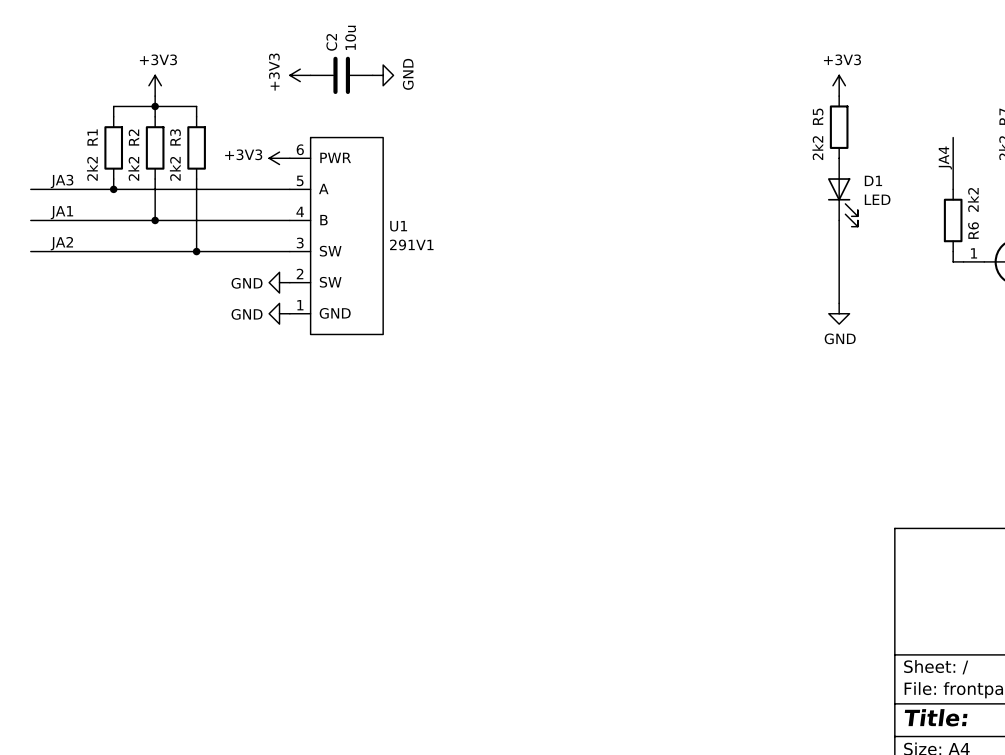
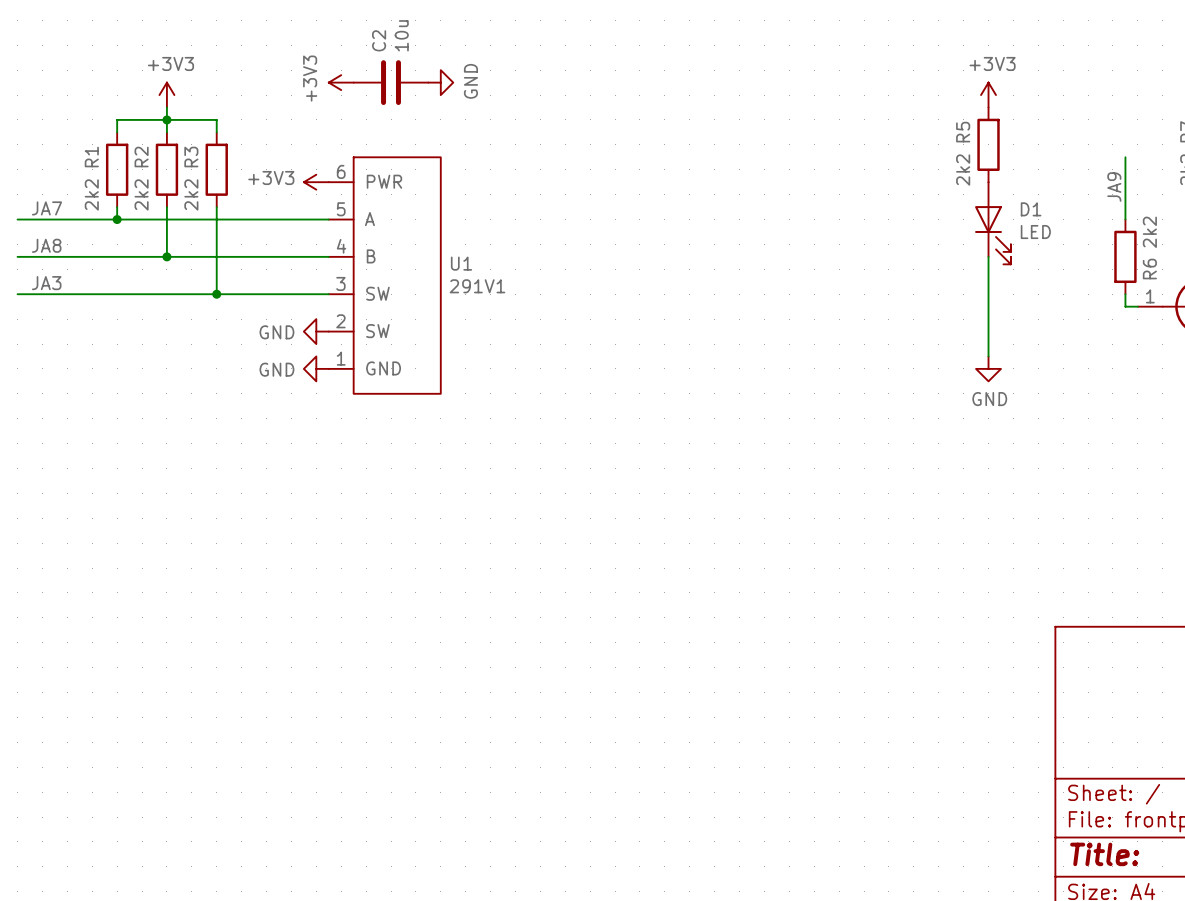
label: JA4 (945, 157) -> JA9 (1114, 187)
label: none -> JA7 (47, 208)
label position: JA3 (62, 181) -> JA3 (46, 283)
label: JA1 (61, 212) -> JA8 (46, 245)
label: JA2 (61, 243) -> none

